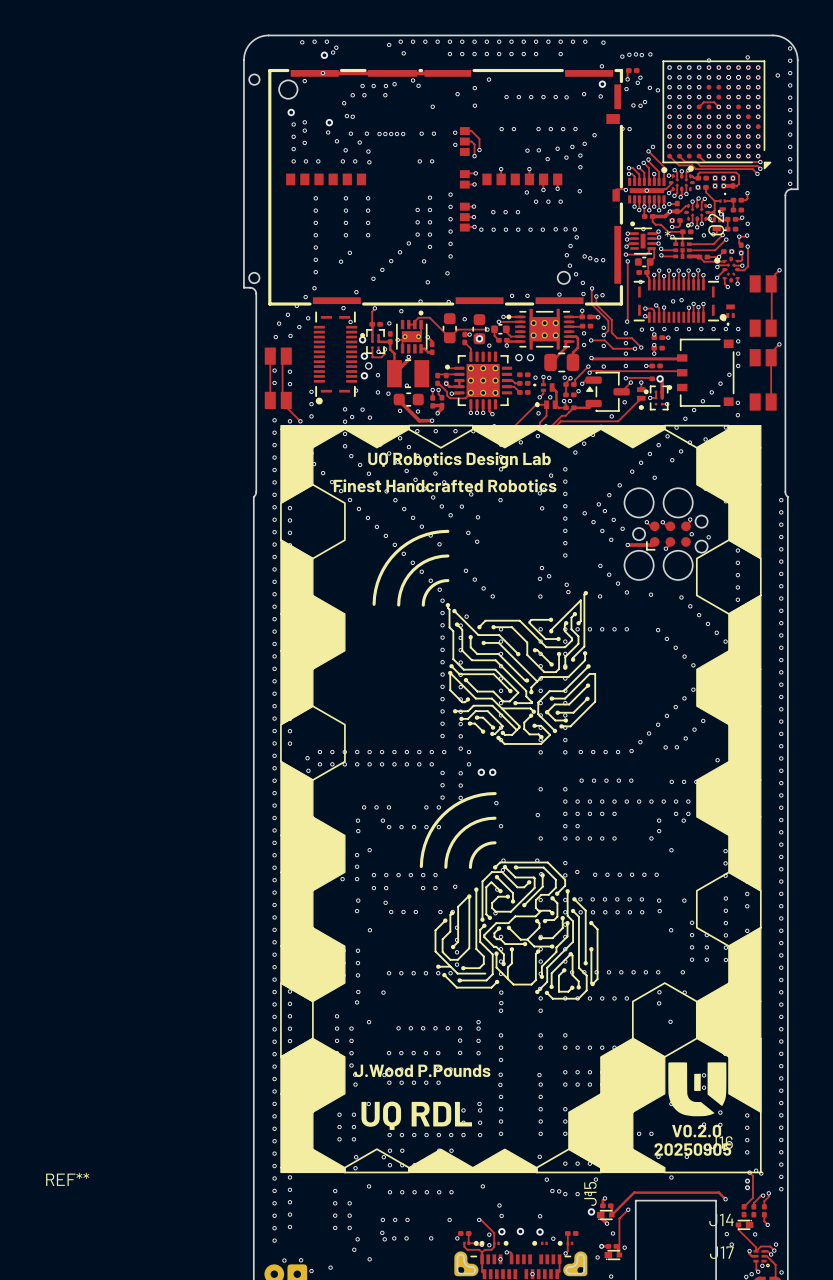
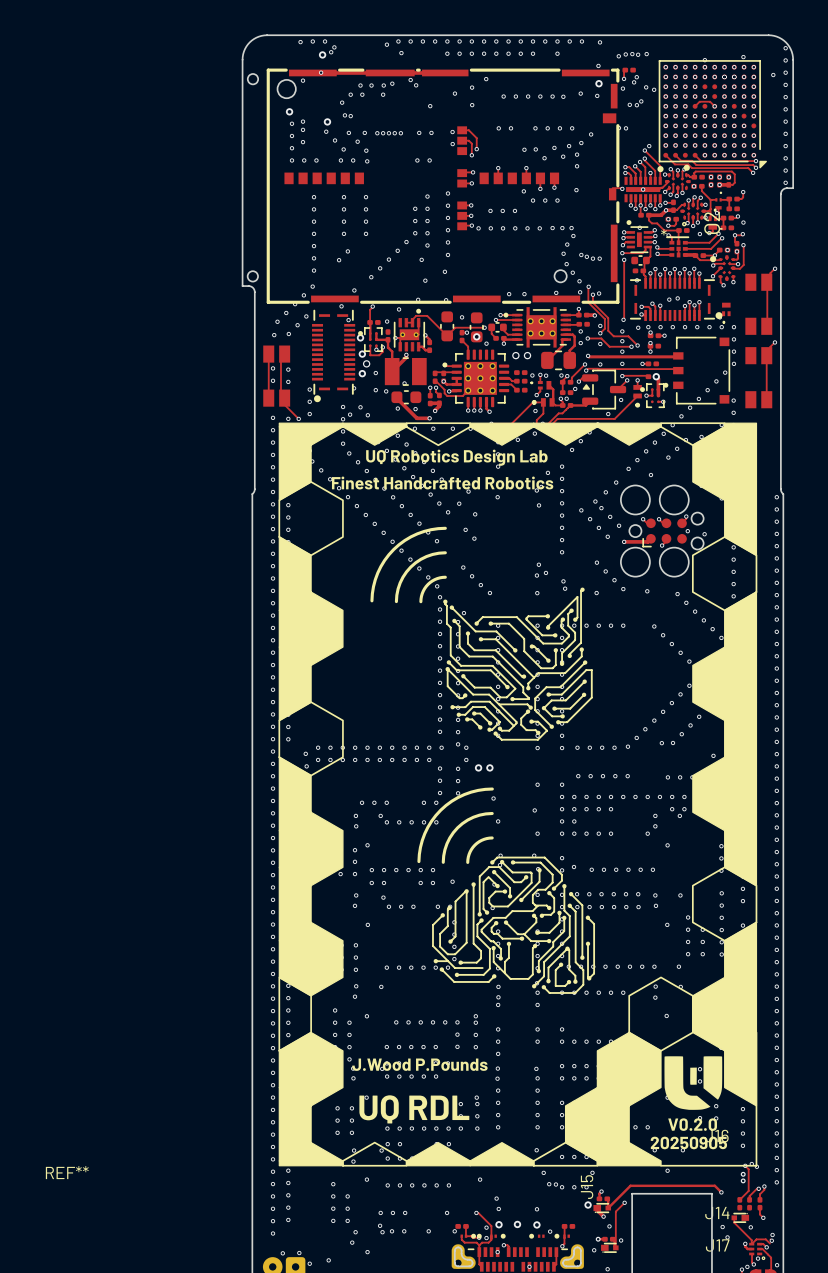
via: none -> (772, 1234)
via: (776, 1244) -> none
via: none -> (771, 1240)
via: (774, 1250) -> none

